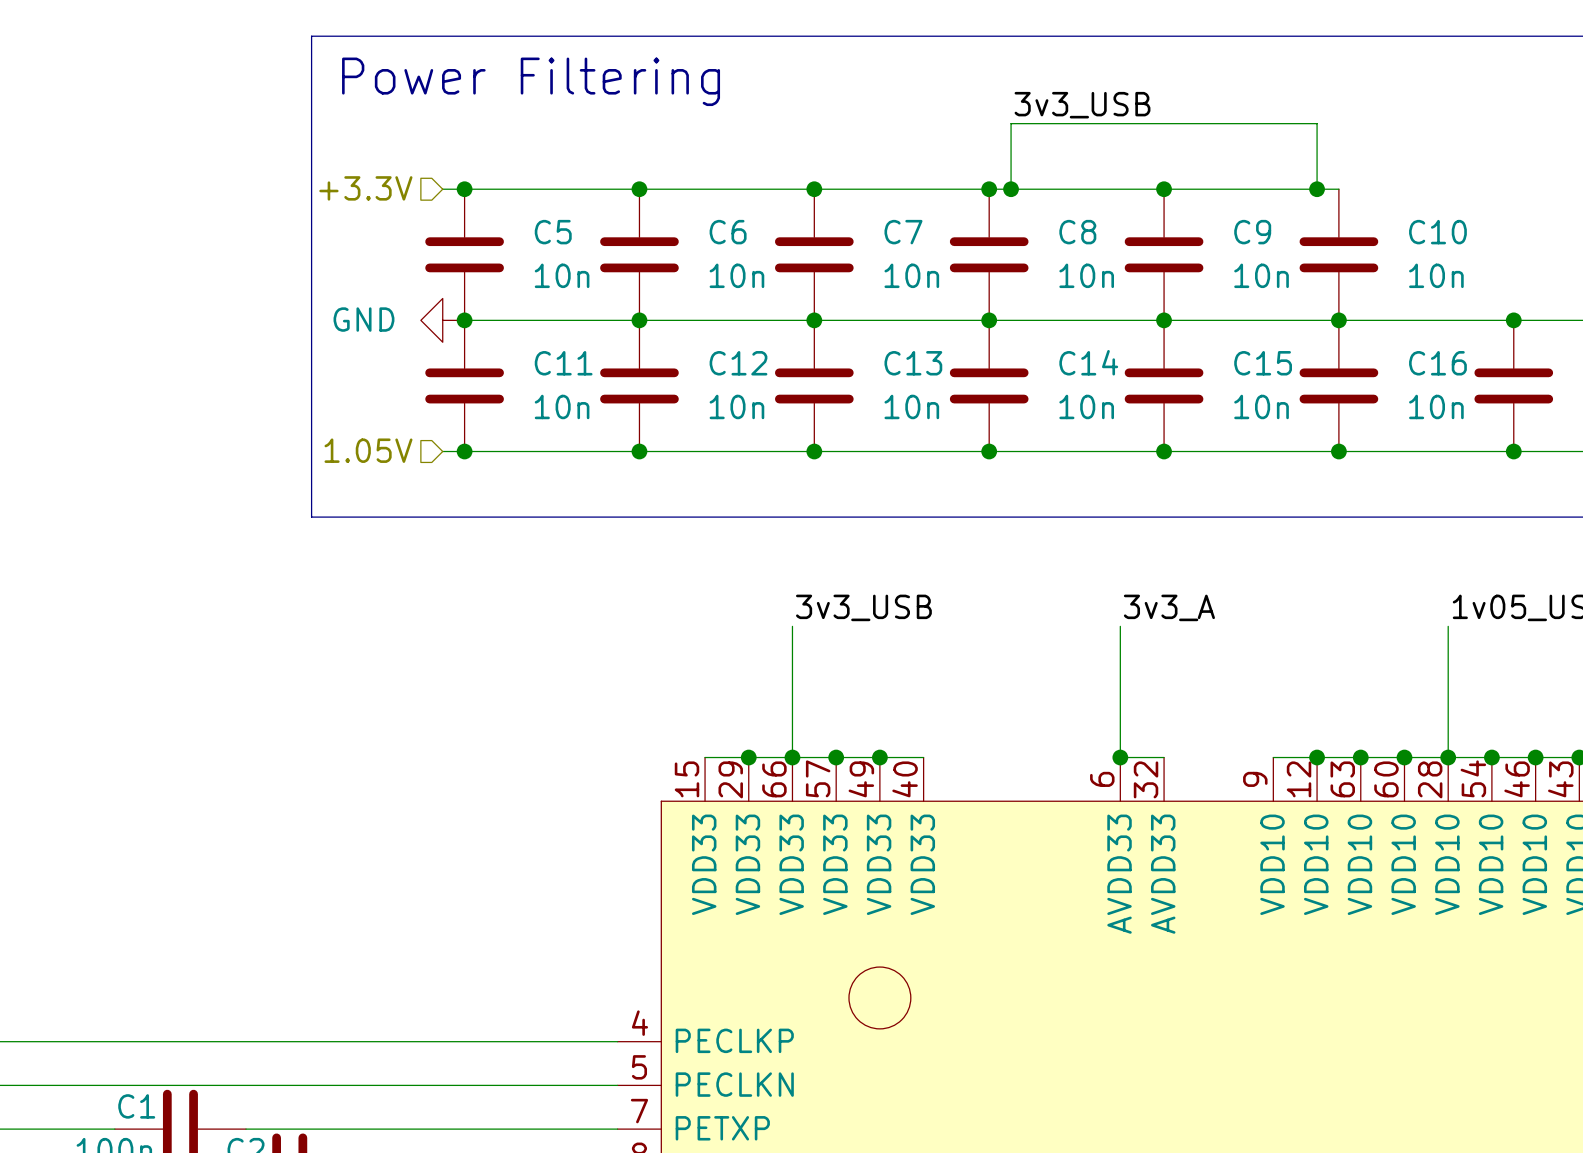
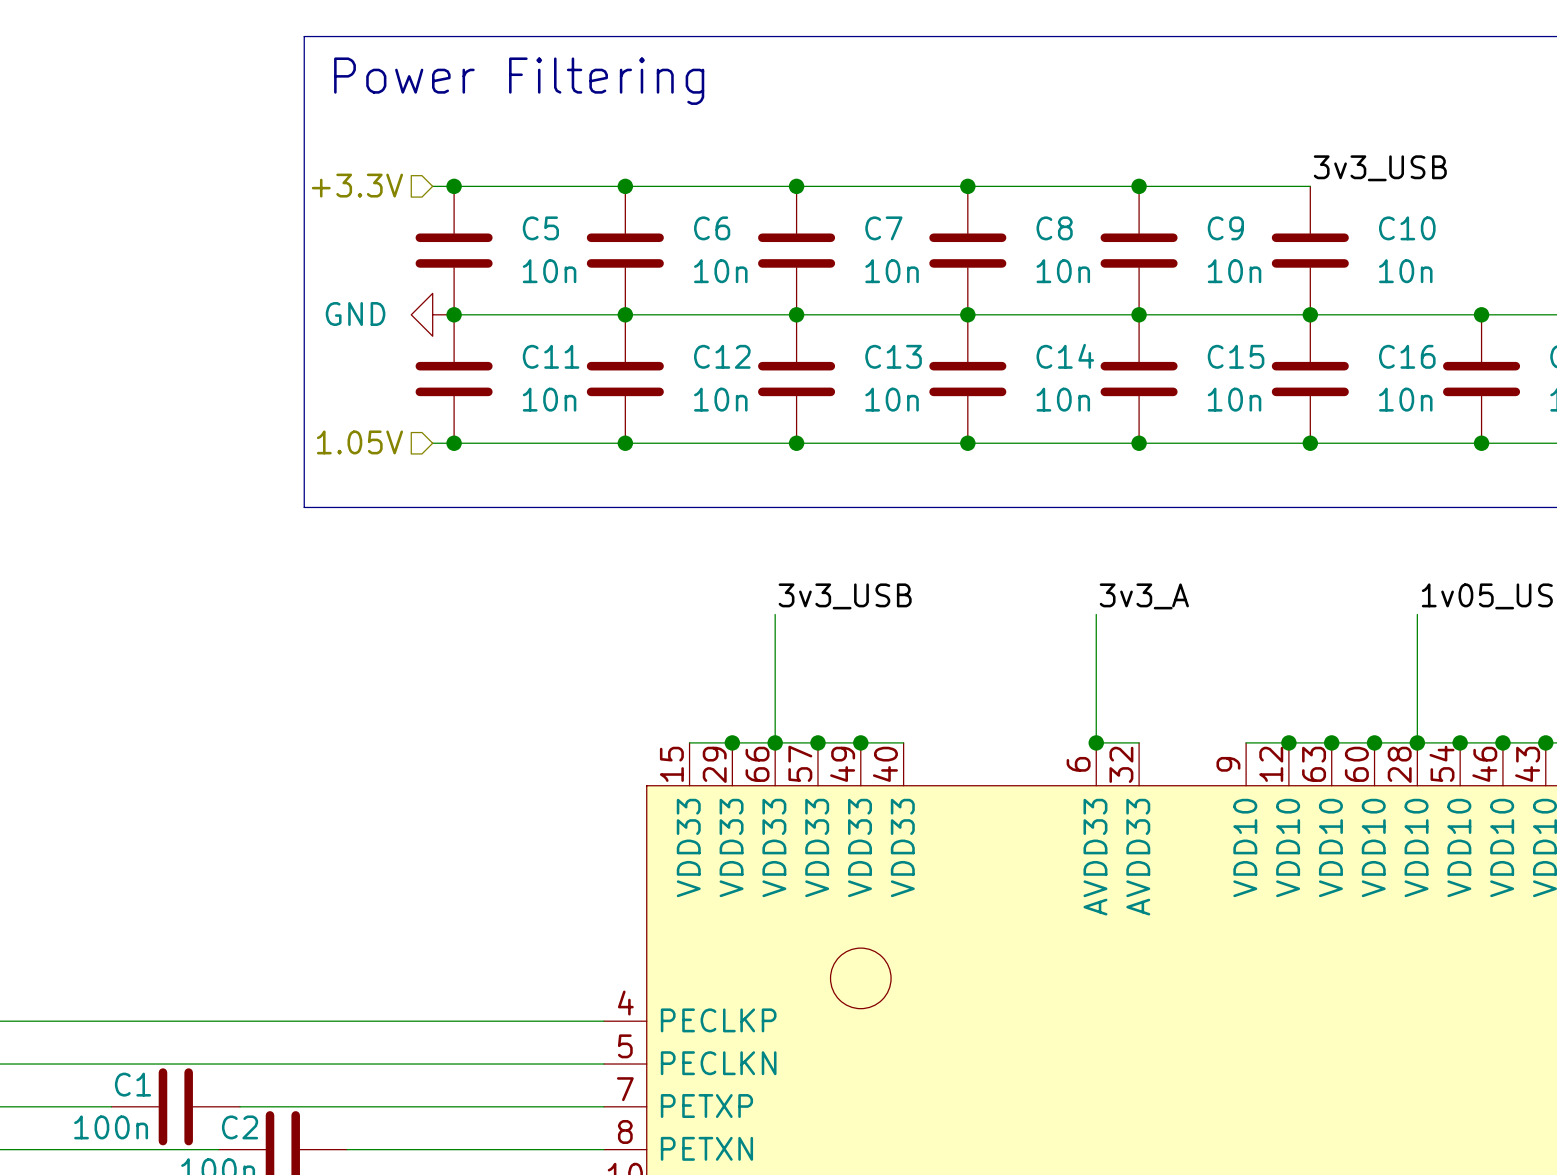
label position: 3v3_USB (1082, 105) -> 3v3_USB (1380, 168)
wire: (1011, 189) (1011, 123) (1317, 123) (1317, 189) -> none
junction: (1011, 189) -> none
junction: (1317, 189) -> none

